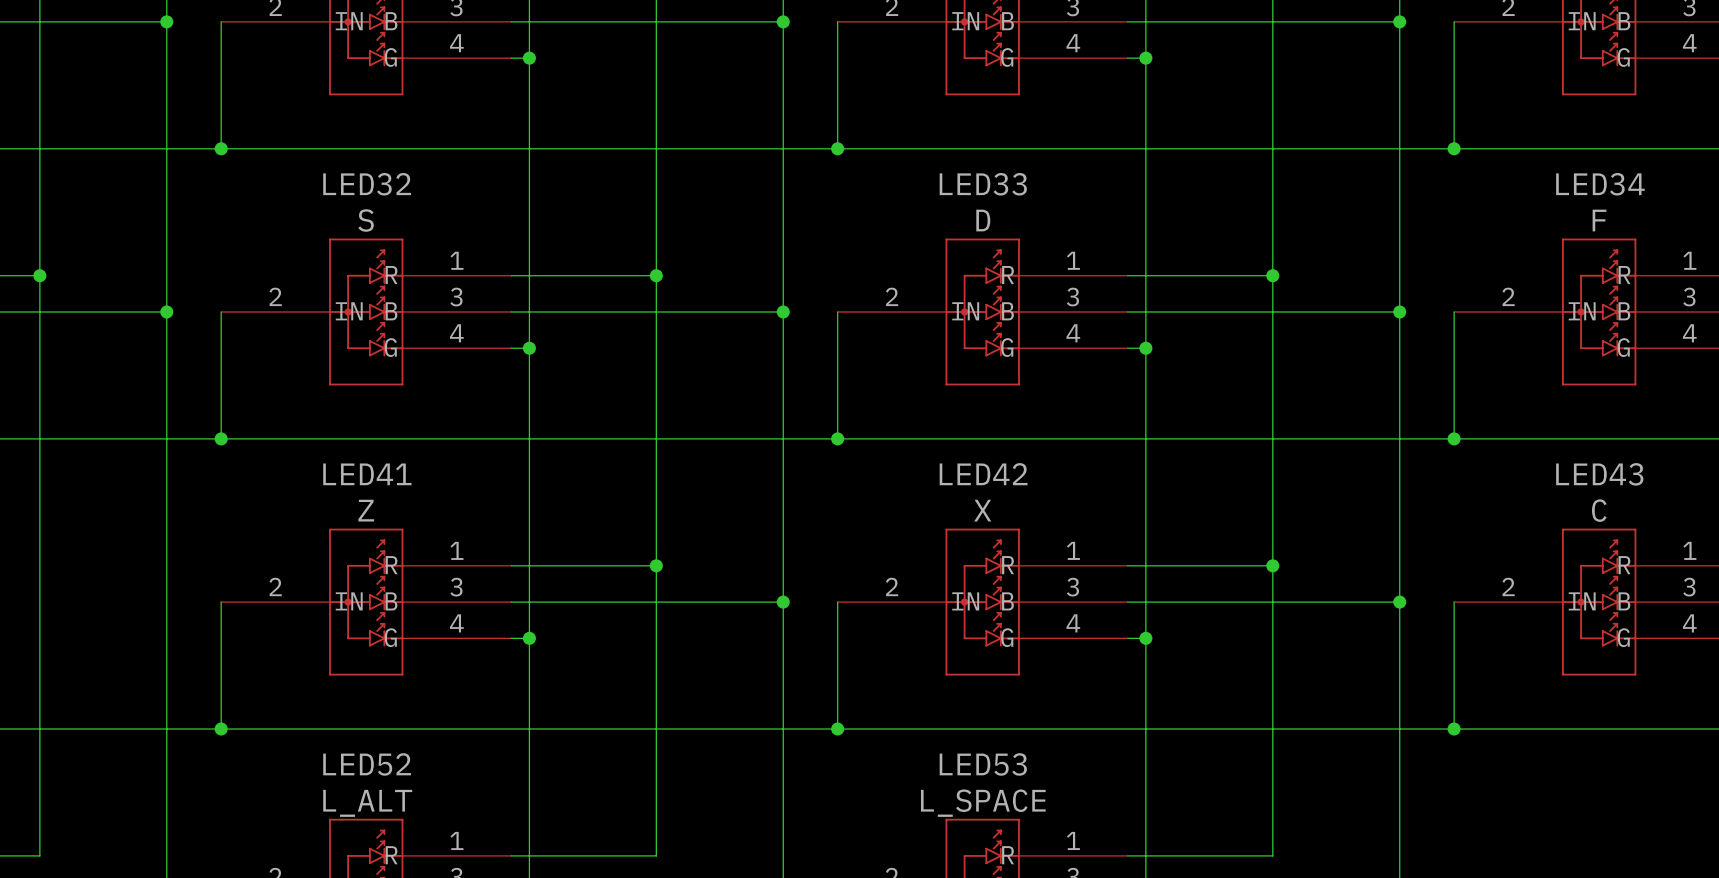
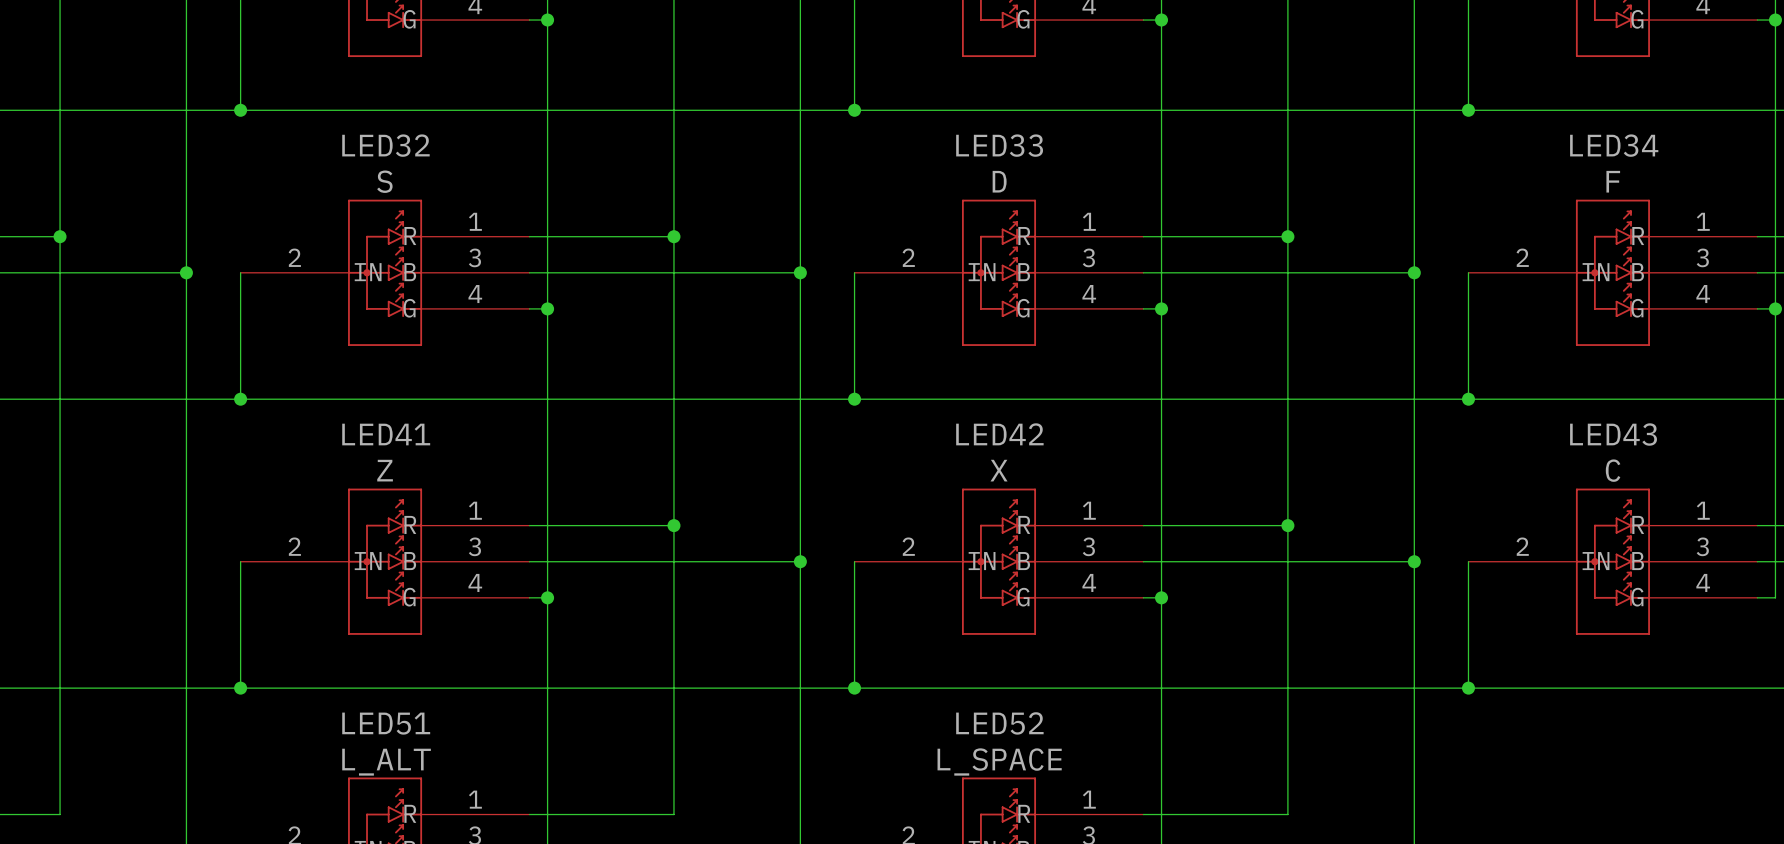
LED52 name: LED52 (367, 764) -> LED51 (386, 723)
LED53 name: LED53 (983, 764) -> LED52 (999, 723)

